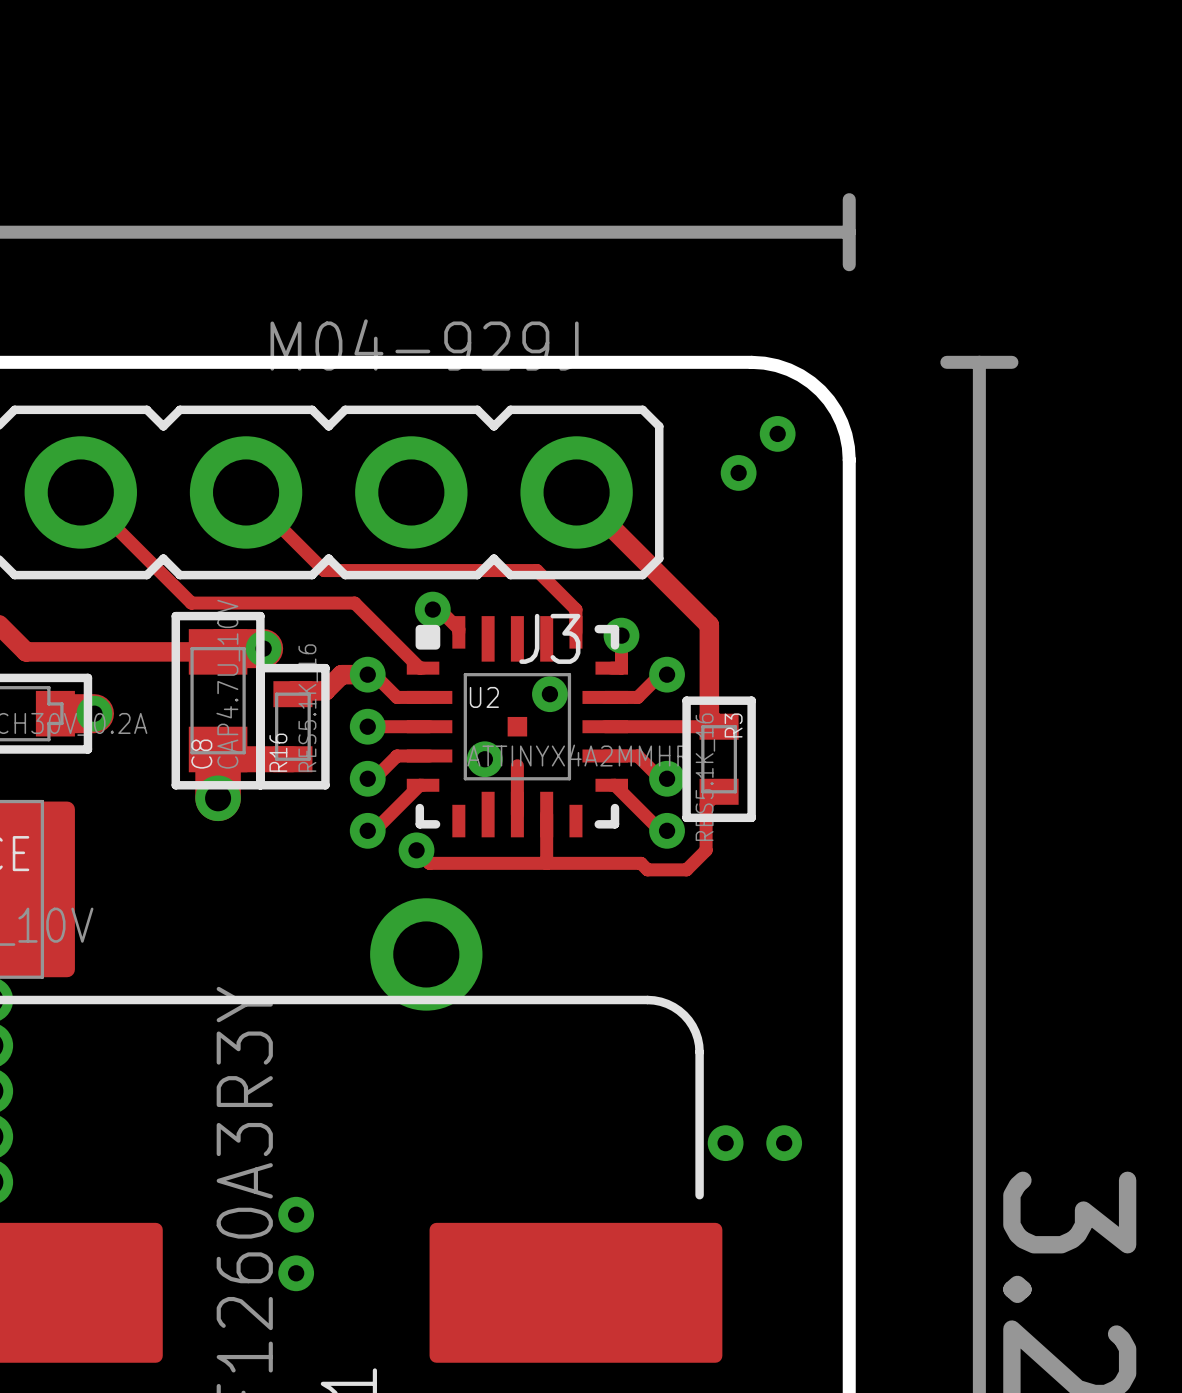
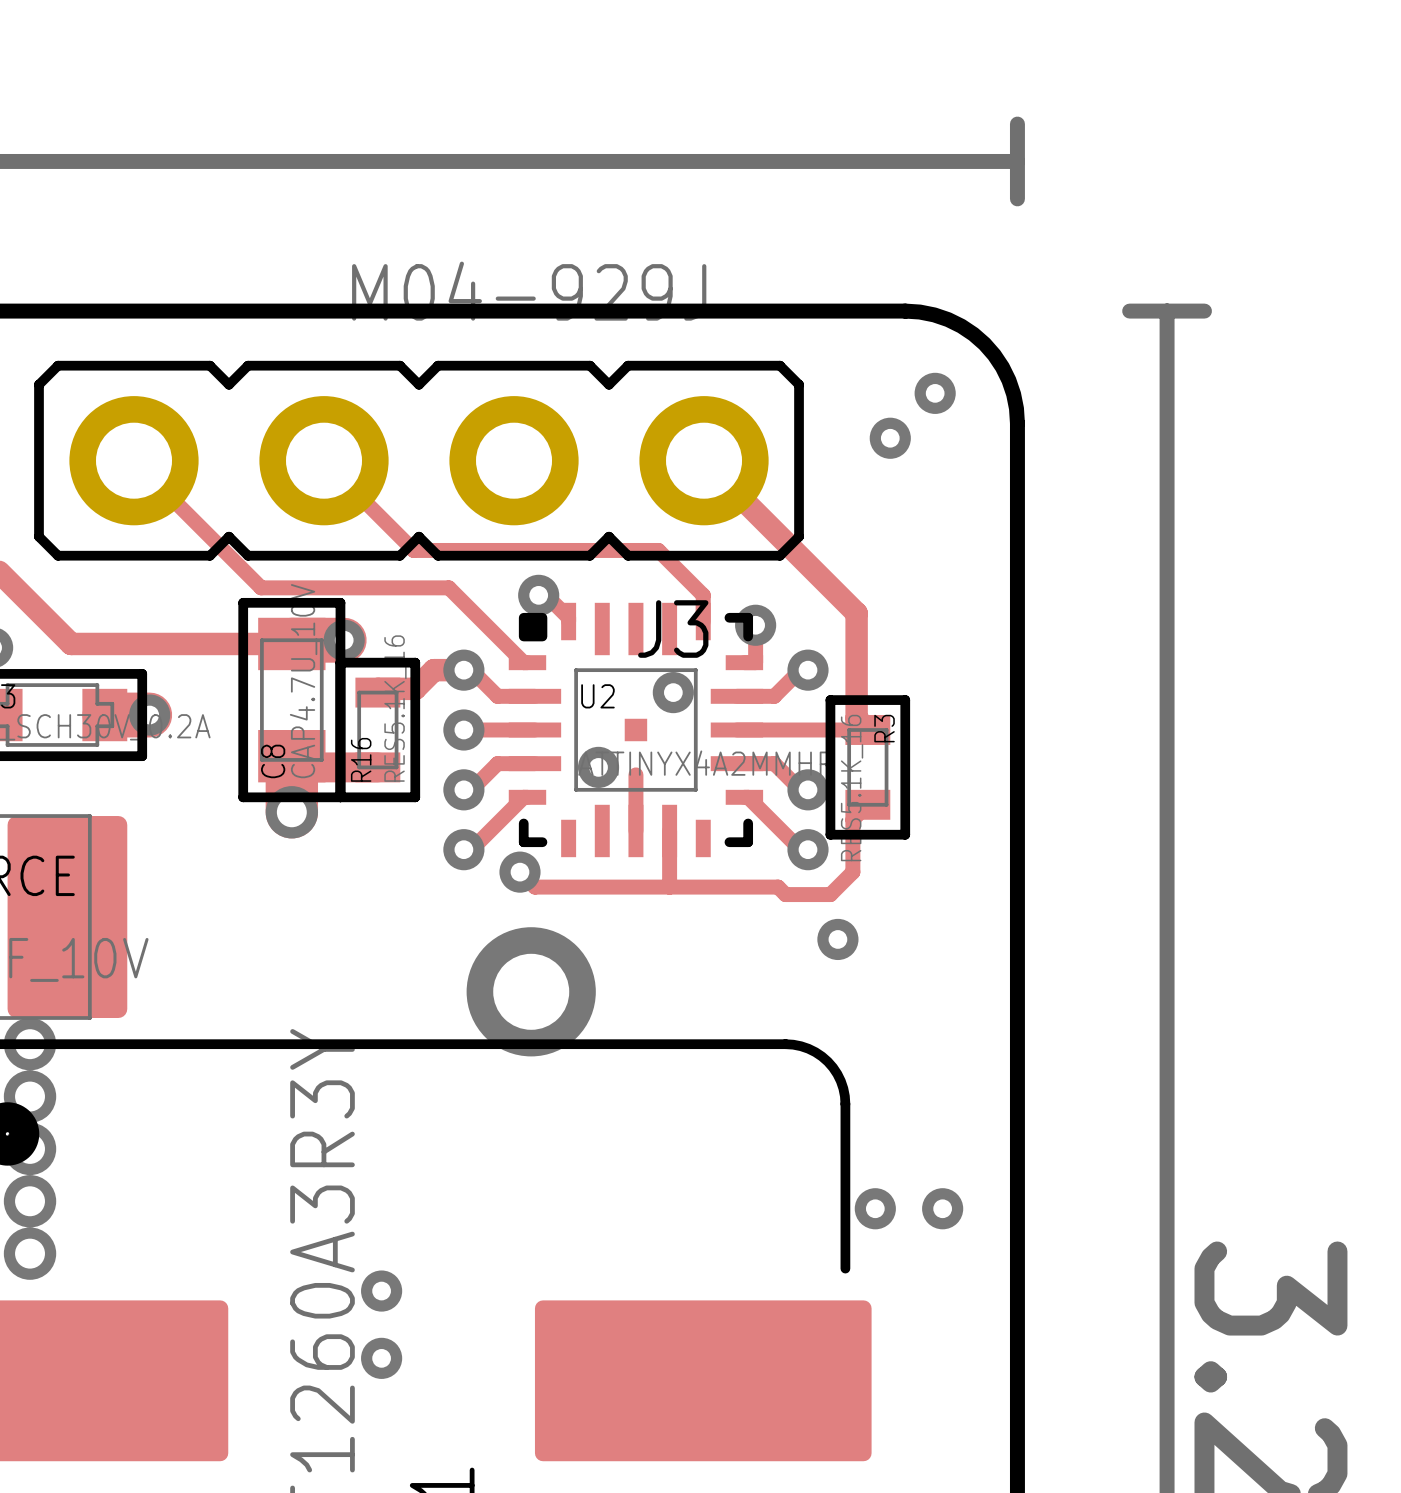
via: none -> (837, 939)

